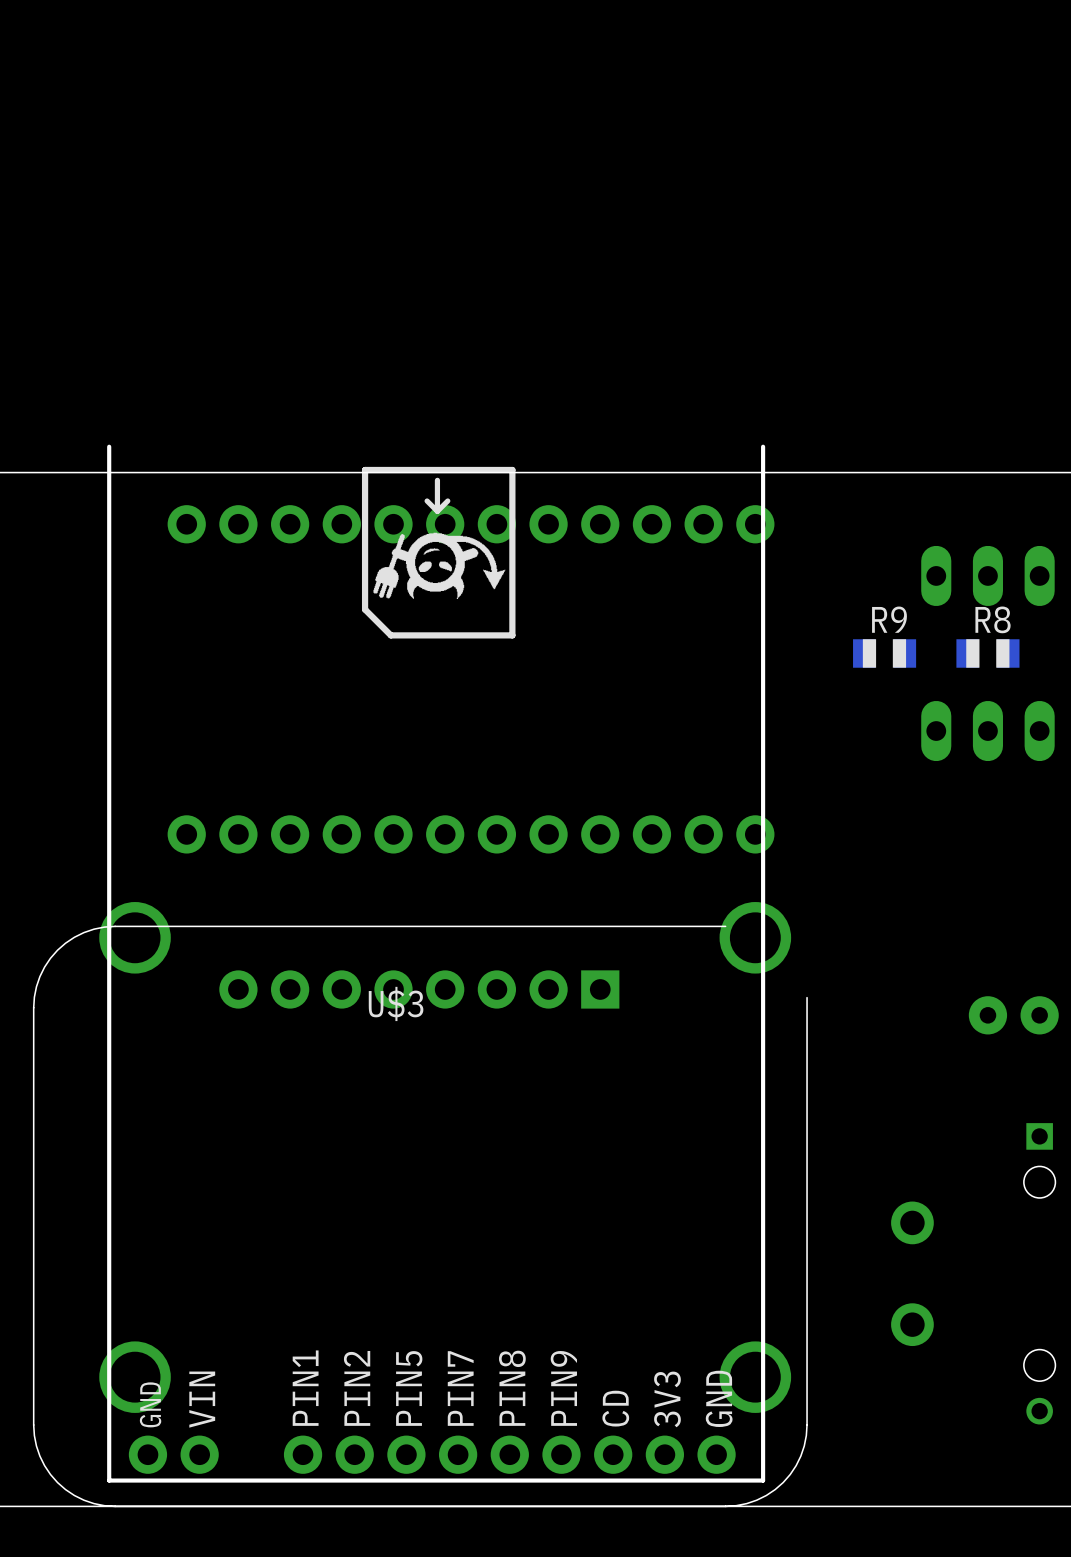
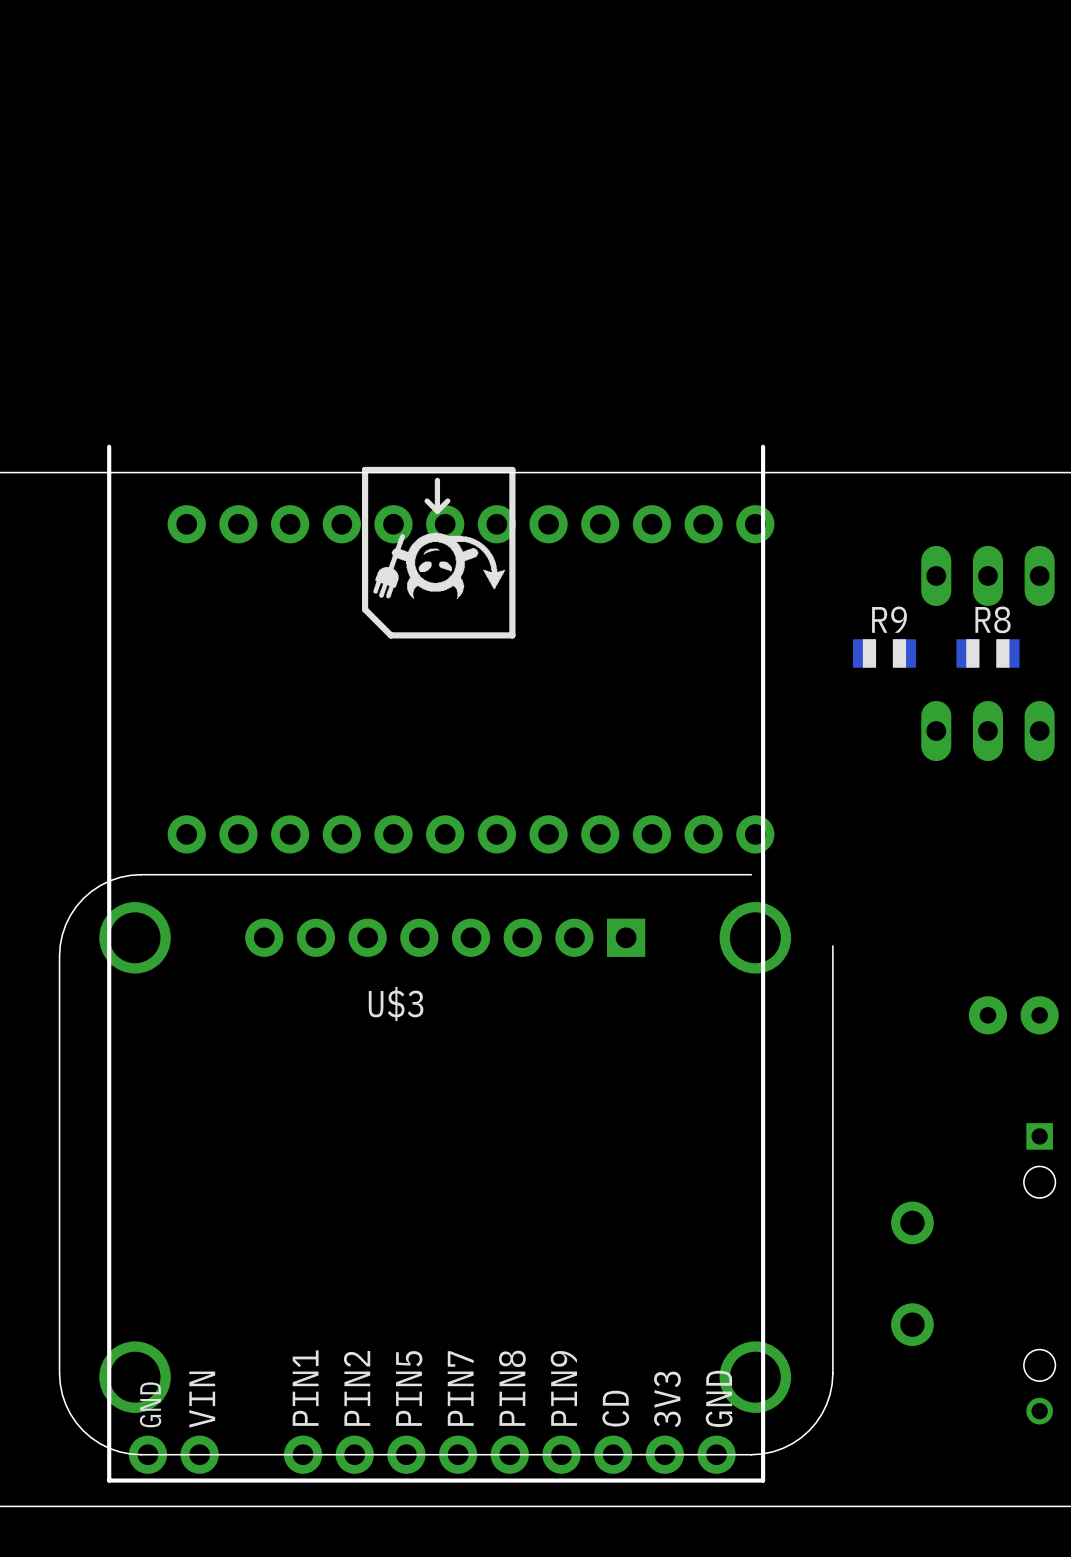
part position: (420, 1216) -> (446, 1164)

